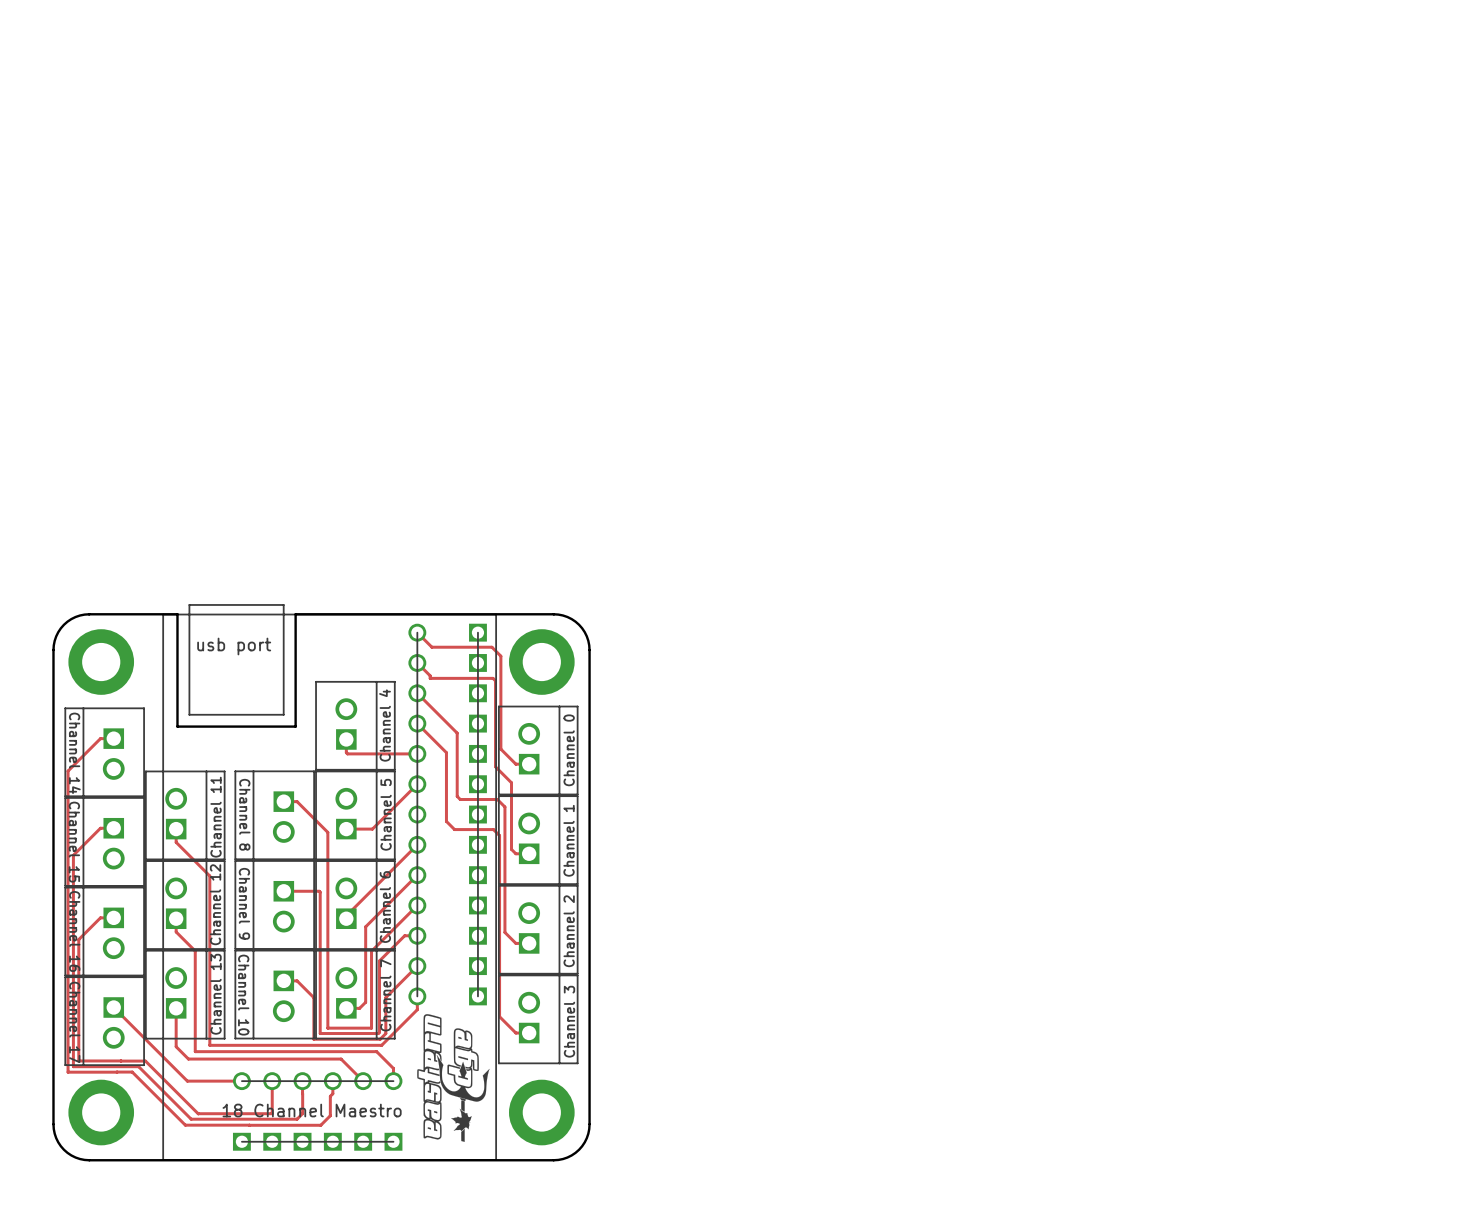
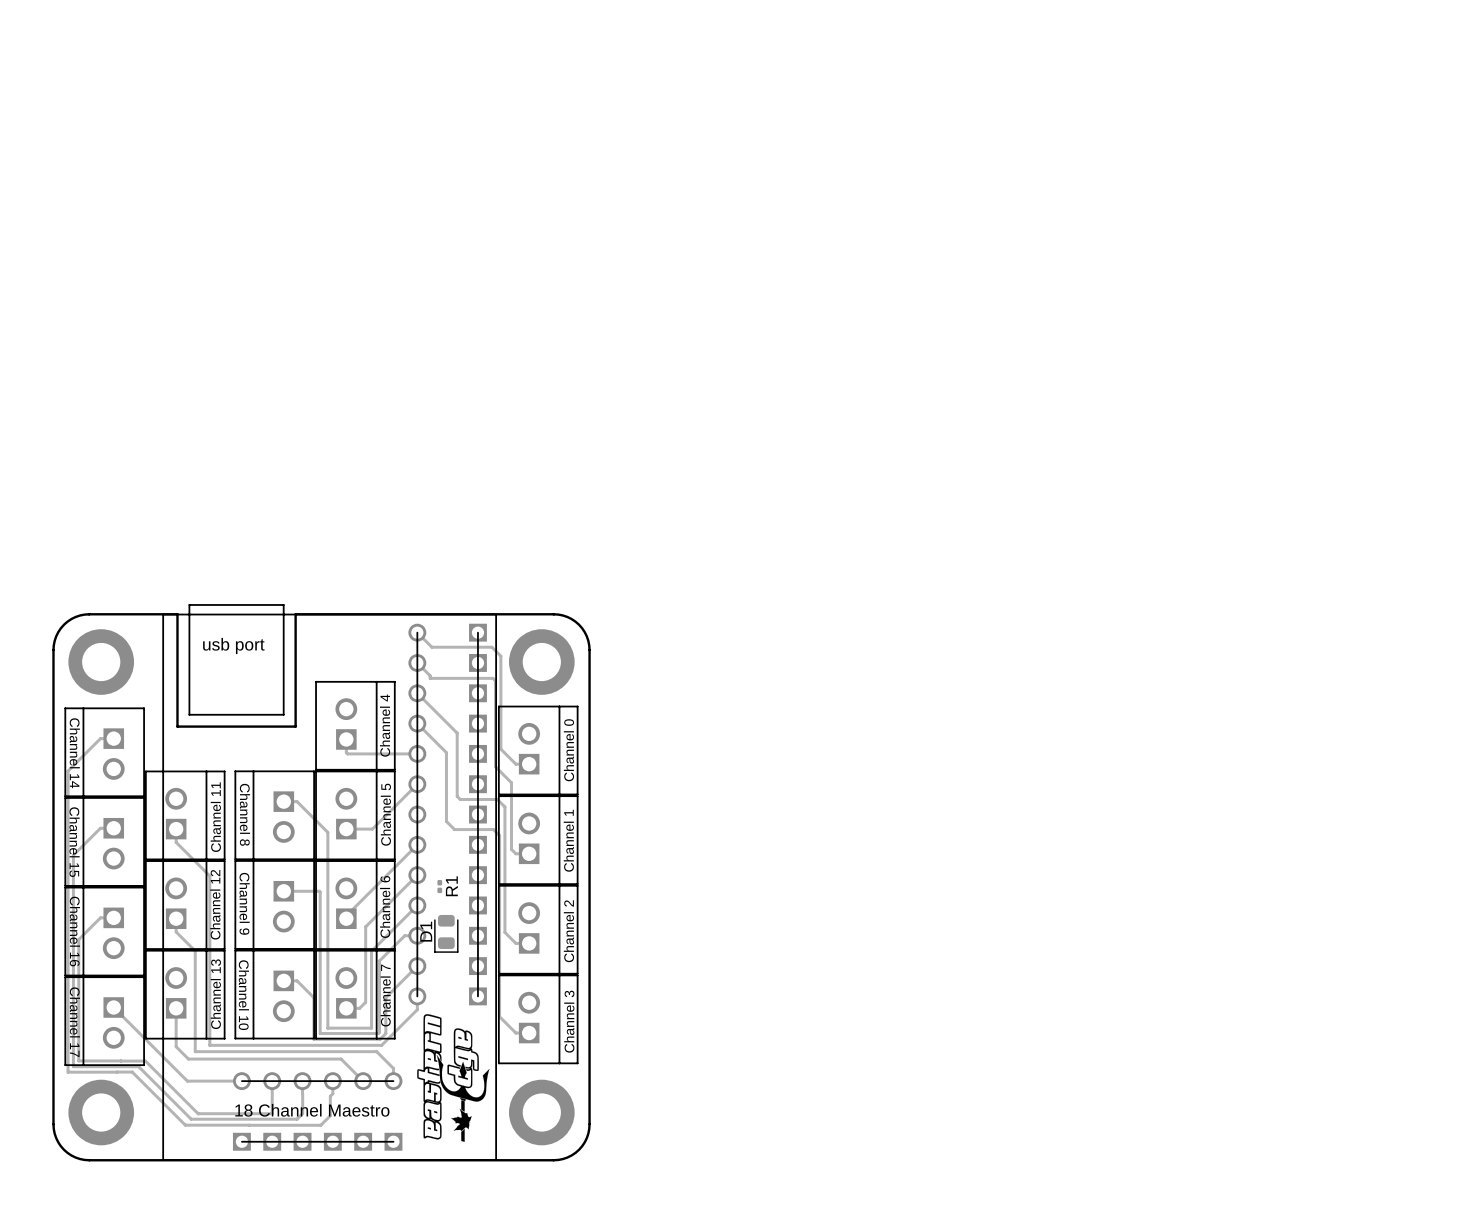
R1: none -> (439, 886)
D1: none -> (446, 933)

